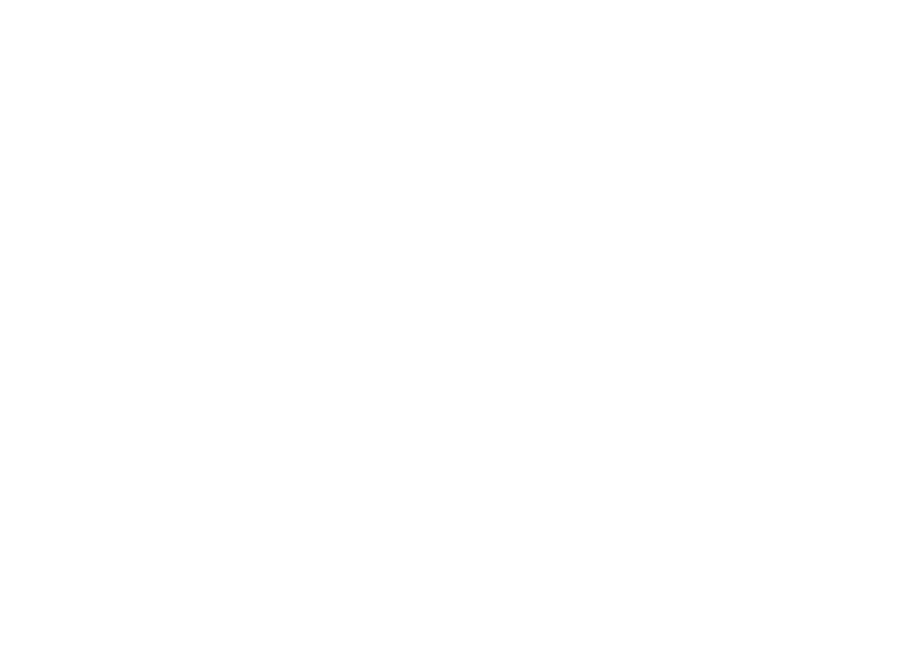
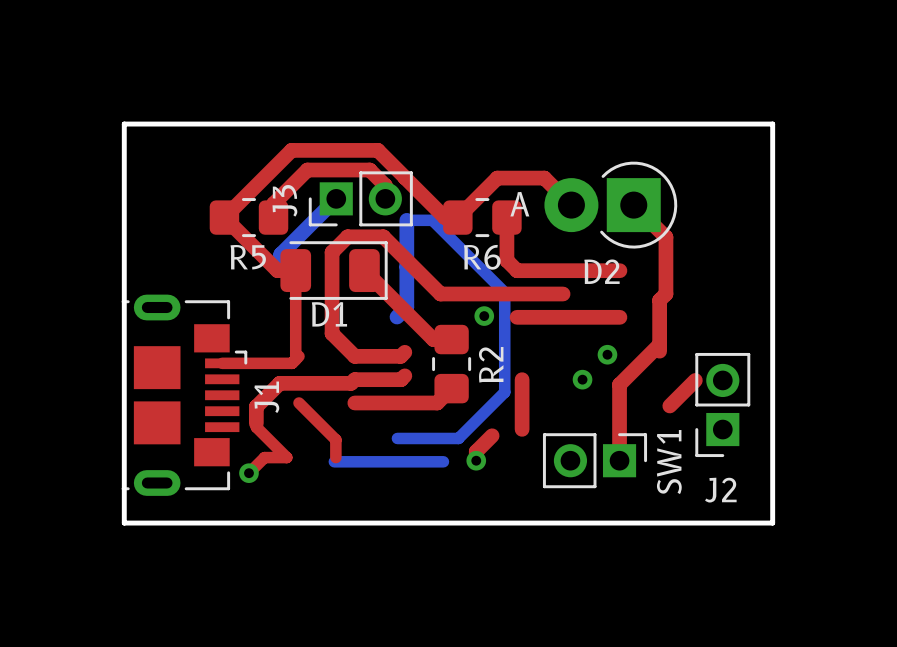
board edge: none -> (124, 124) (772, 124) (772, 523) (124, 523) (124, 124)
bottom track: none -> (336, 198) (280, 254) (280, 267)
J3: none -> (360, 198)
top track: none -> (385, 198) (385, 185) (369, 170) (307, 170) (273, 203) (273, 217)
top track: none -> (571, 205) (544, 178) (497, 178) (457, 217) (444, 217) (377, 150) (291, 150) (224, 217)
D2: none -> (610, 205)
top track: none -> (633, 205) (665, 237) (665, 294) (659, 300) (659, 351)
R5: none -> (248, 217)
R6: none -> (482, 217)
top track: none -> (506, 217) (506, 260) (517, 270) (619, 270)
top track: none -> (224, 221) (228, 221) (277, 270) (295, 270) (295, 359)
D1: none -> (334, 270)
top track: none -> (364, 270) (433, 339) (451, 339)
top track: none -> (563, 294) (440, 294) (383, 236) (347, 236) (332, 252) (332, 333) (354, 356) (400, 356) (404, 352)
via: none -> (484, 316)
bottom track: none -> (396, 317) (406, 307) (406, 220) (432, 220) (504, 292) (504, 392) (458, 438) (397, 438)
top track: none -> (517, 317) (619, 317)
top track: none -> (659, 344) (619, 384) (619, 460)
via: none -> (607, 354)
top track: none -> (298, 356) (292, 363) (222, 363)
R2: none -> (451, 364)
top track: none -> (404, 375) (401, 379) (354, 379) (351, 383) (279, 383) (256, 406) (256, 427) (286, 457) (264, 457) (248, 473)
top track: none -> (522, 379) (522, 429)
via: none -> (582, 379)
top track: none -> (695, 380) (669, 405)
top track: none -> (451, 388) (437, 402) (354, 402)
J1: none -> (184, 395)
top track: none -> (298, 402) (335, 439) (335, 457)
J2: none -> (722, 404)
top track: none -> (492, 435) (476, 451) (476, 460)
via: none -> (476, 460)
SW1: none -> (594, 460)
bottom track: none -> (334, 461) (443, 461)
via: none -> (248, 473)

